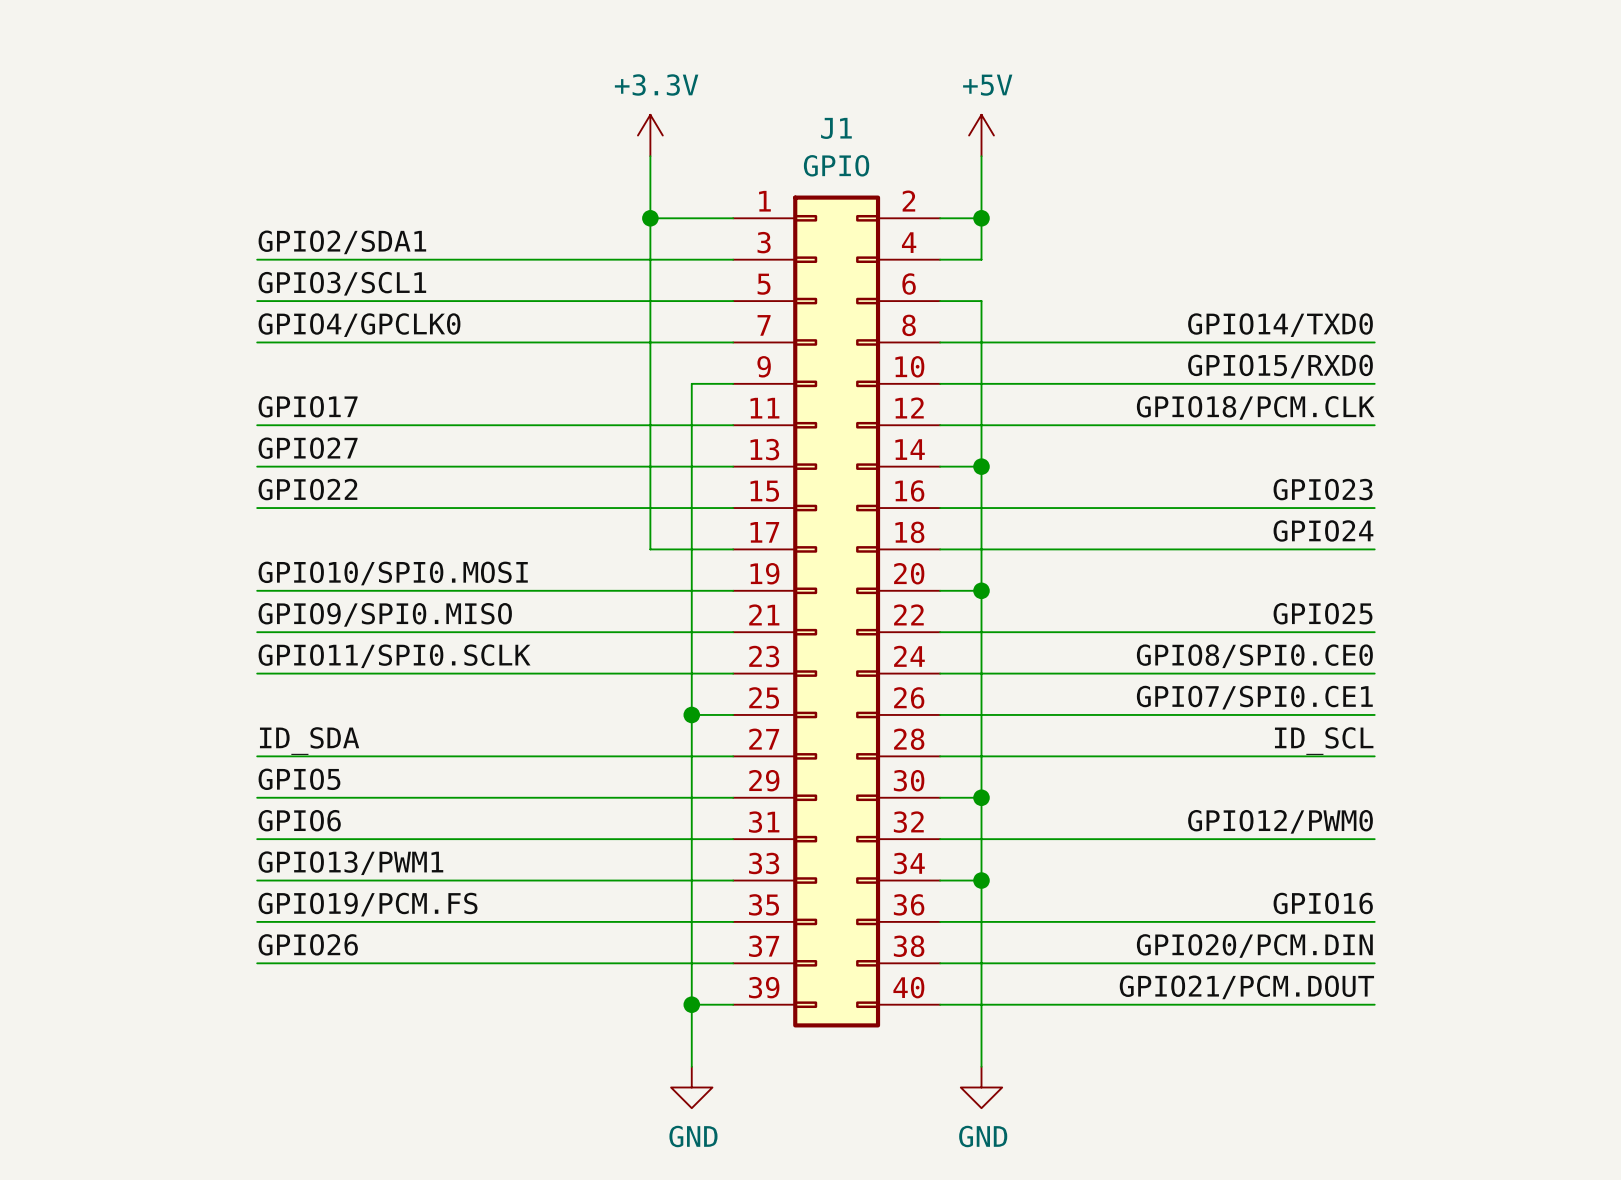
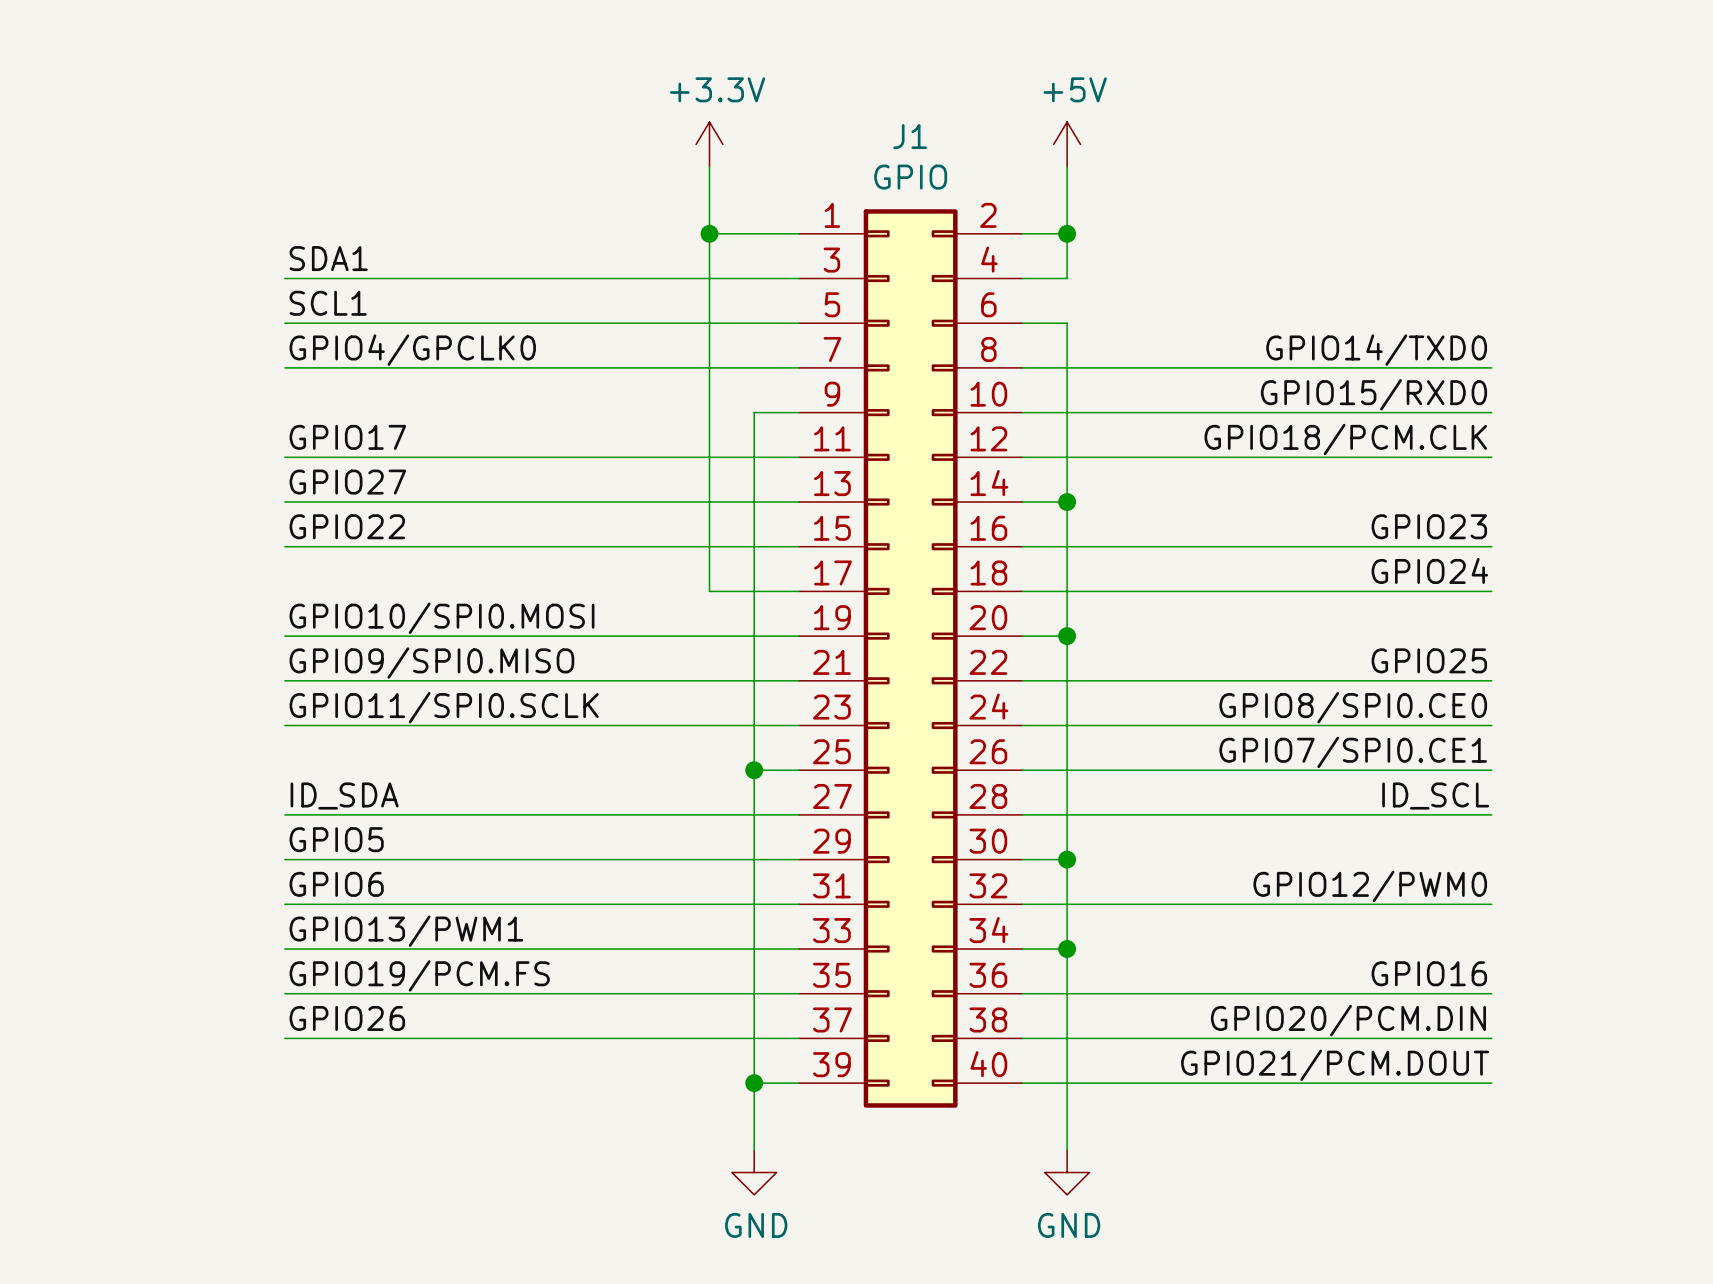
label: GPIO2/SDA1 (342, 242) -> SDA1 (328, 258)
label: GPIO3/SCL1 (342, 283) -> SCL1 (328, 303)

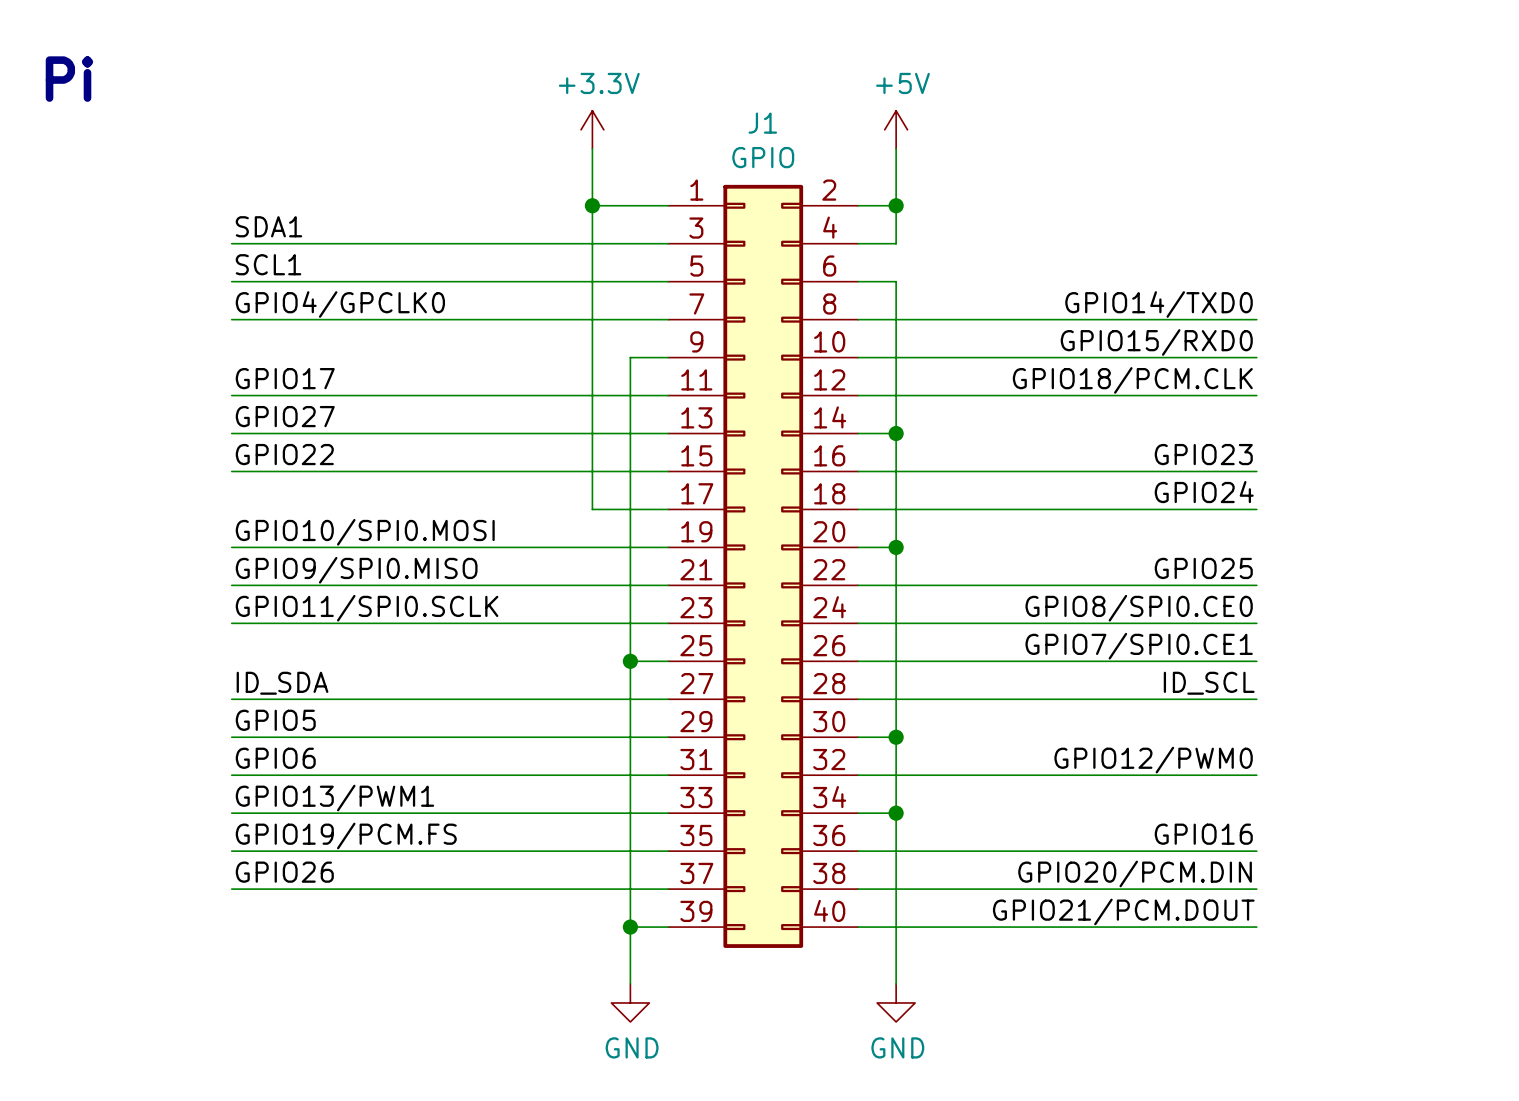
text: none -> Pi (69, 79)

